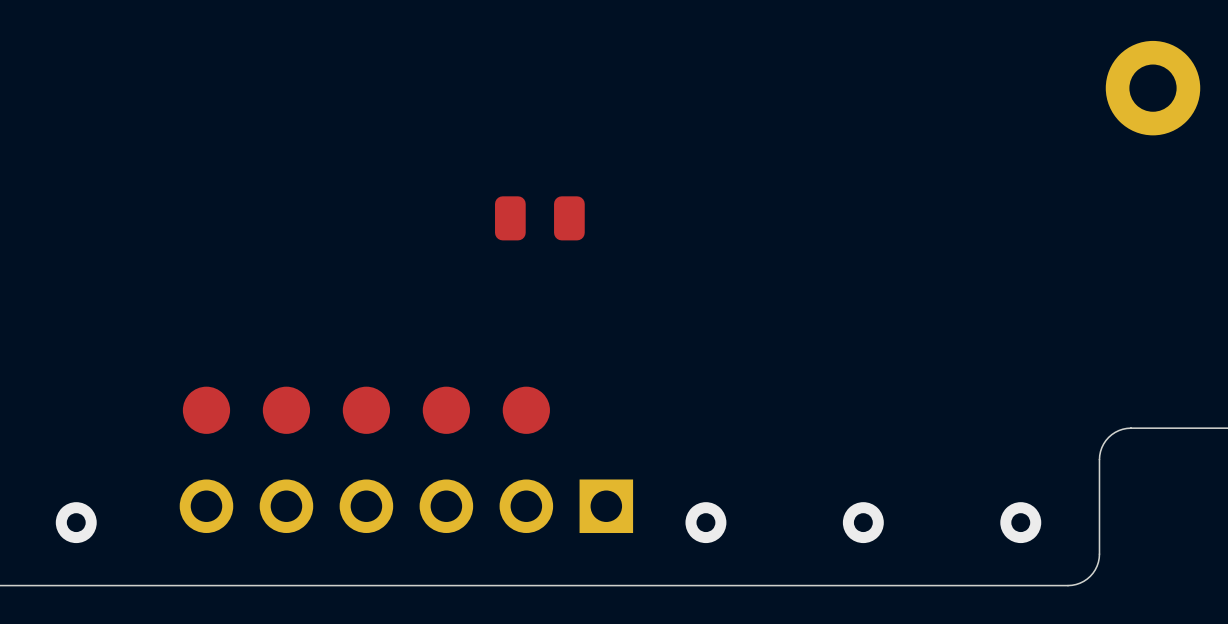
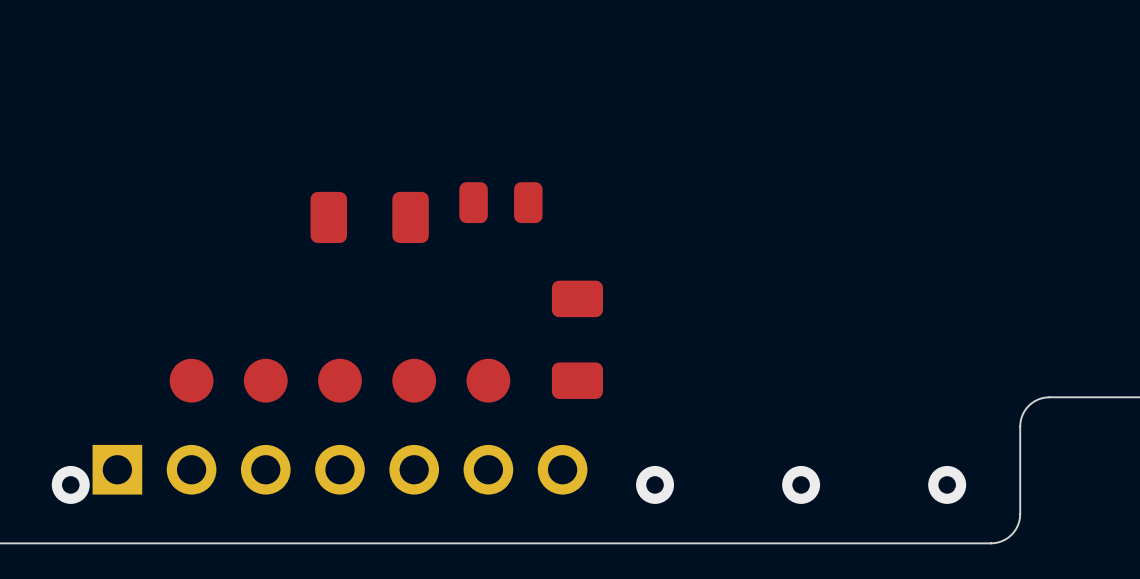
part: (1153, 88) -> none
part: none -> (369, 217)
part: none -> (577, 339)
part: none -> (339, 469)
part: (406, 506) -> none

